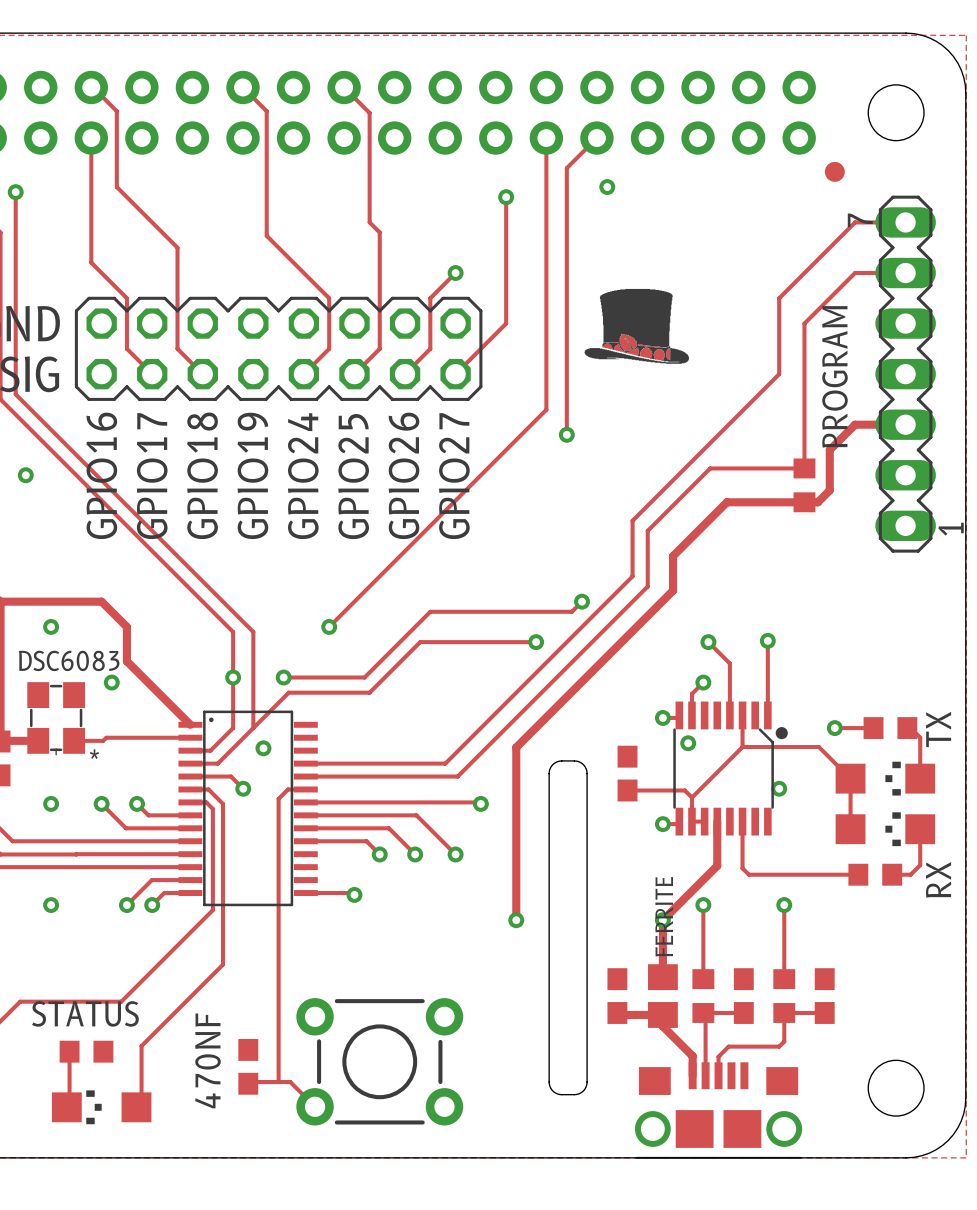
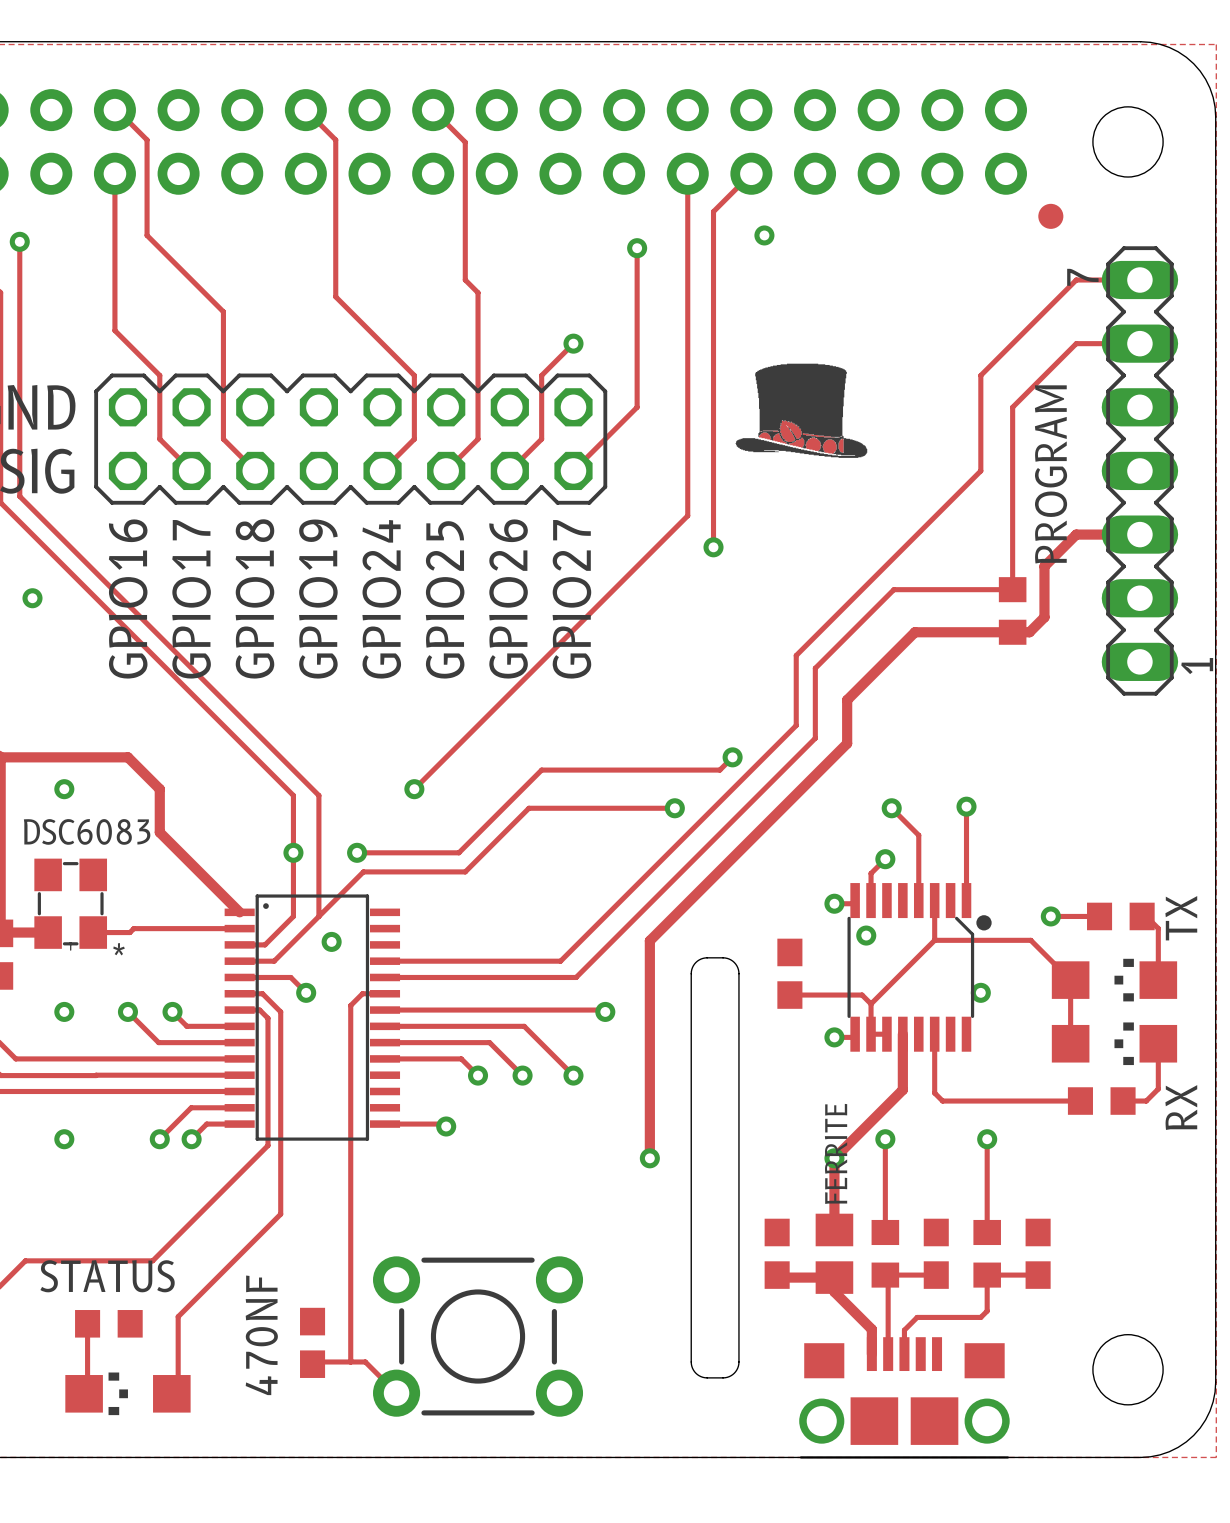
via: (111, 682) -> none

